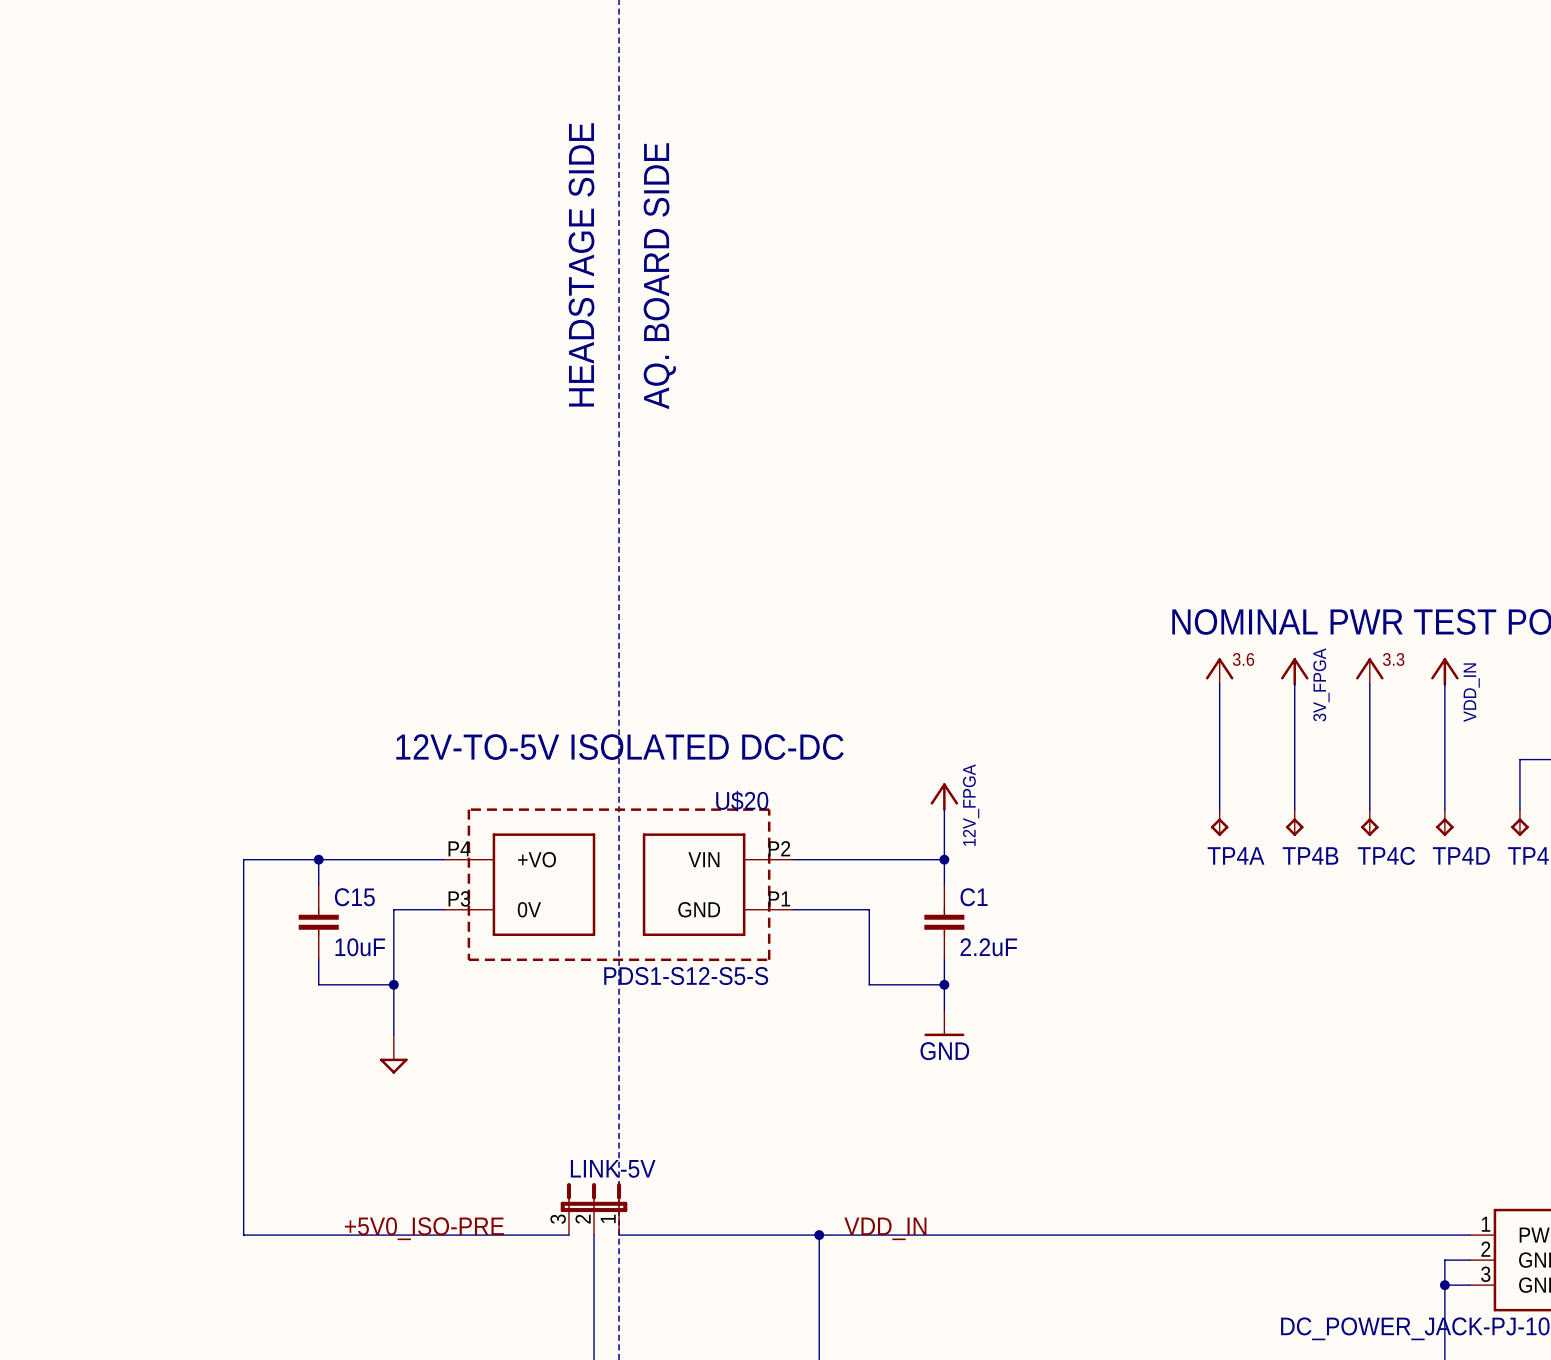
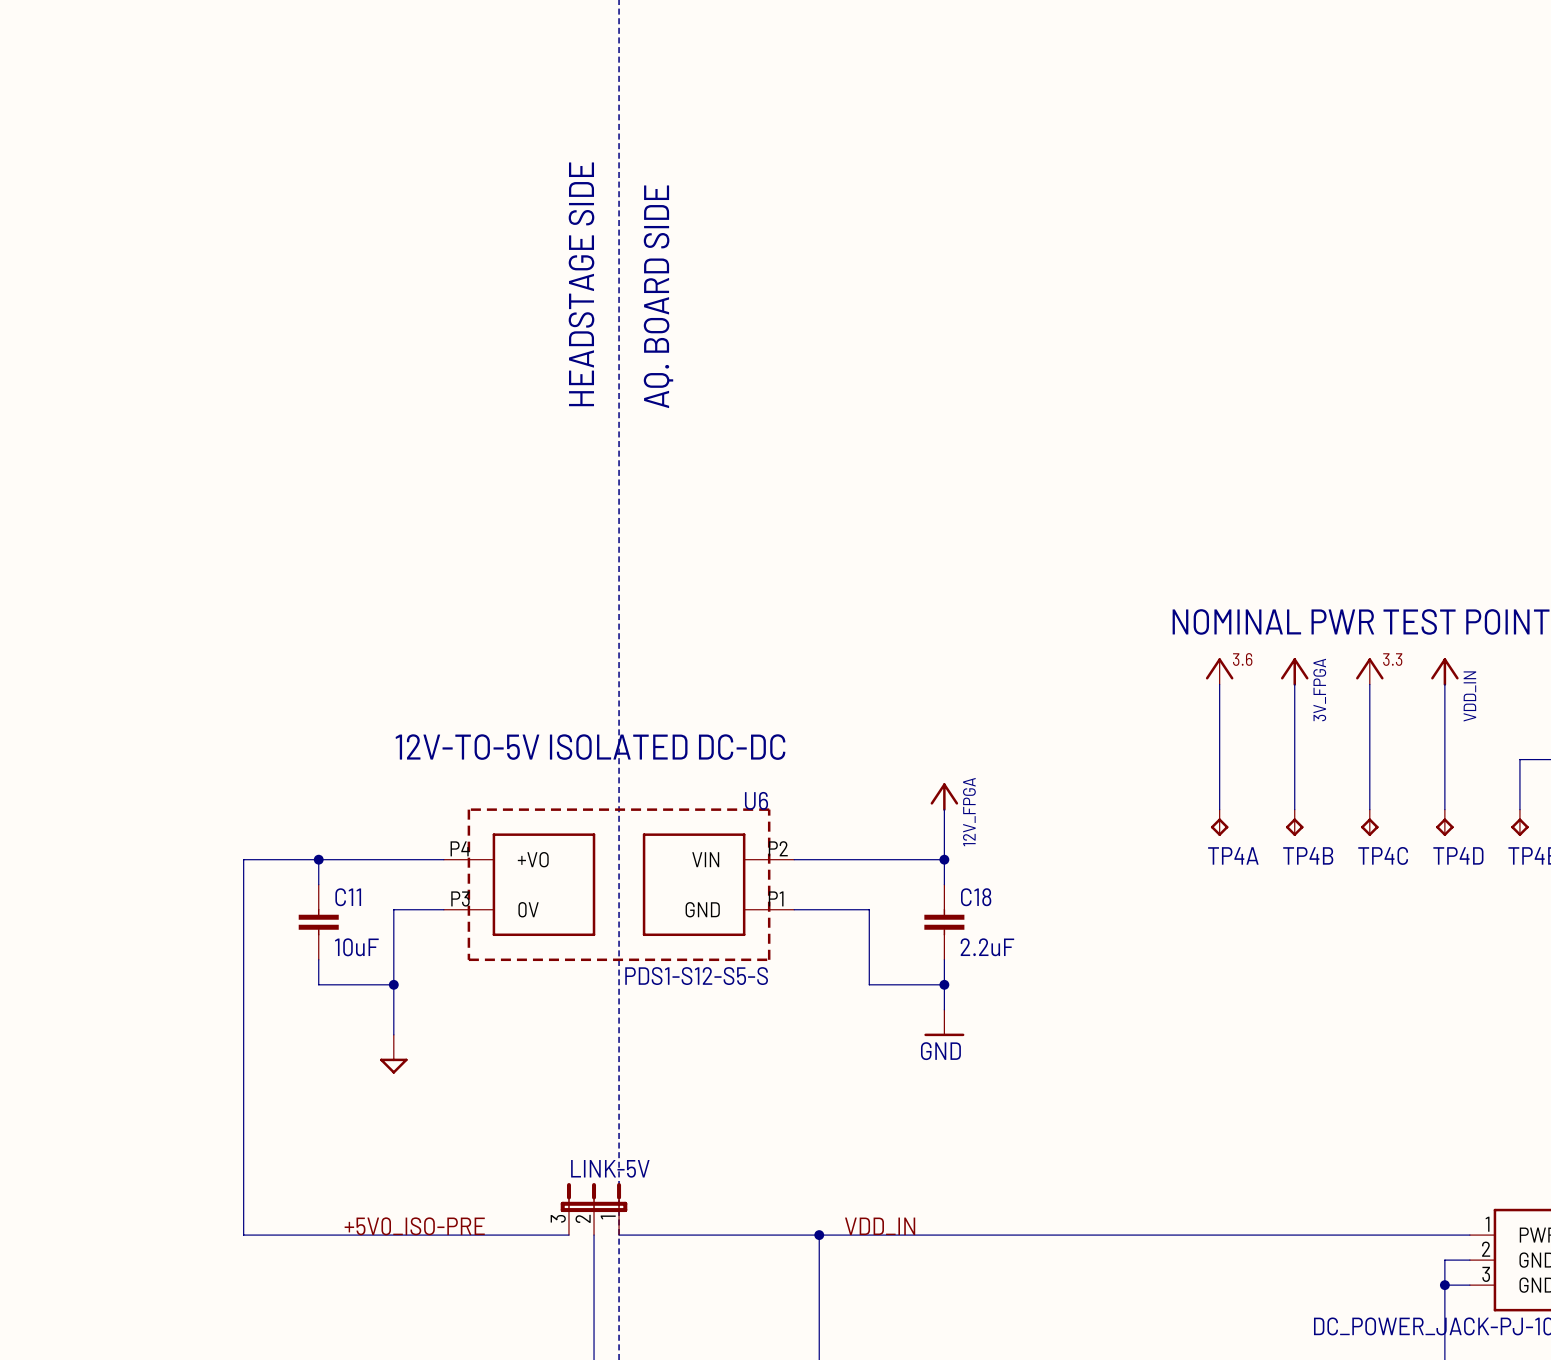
U$20 name: U$20 (742, 801) -> U6 (756, 800)
C15 name: C15 (354, 897) -> C11 (348, 897)
C1 name: C1 (974, 897) -> C18 (976, 897)

